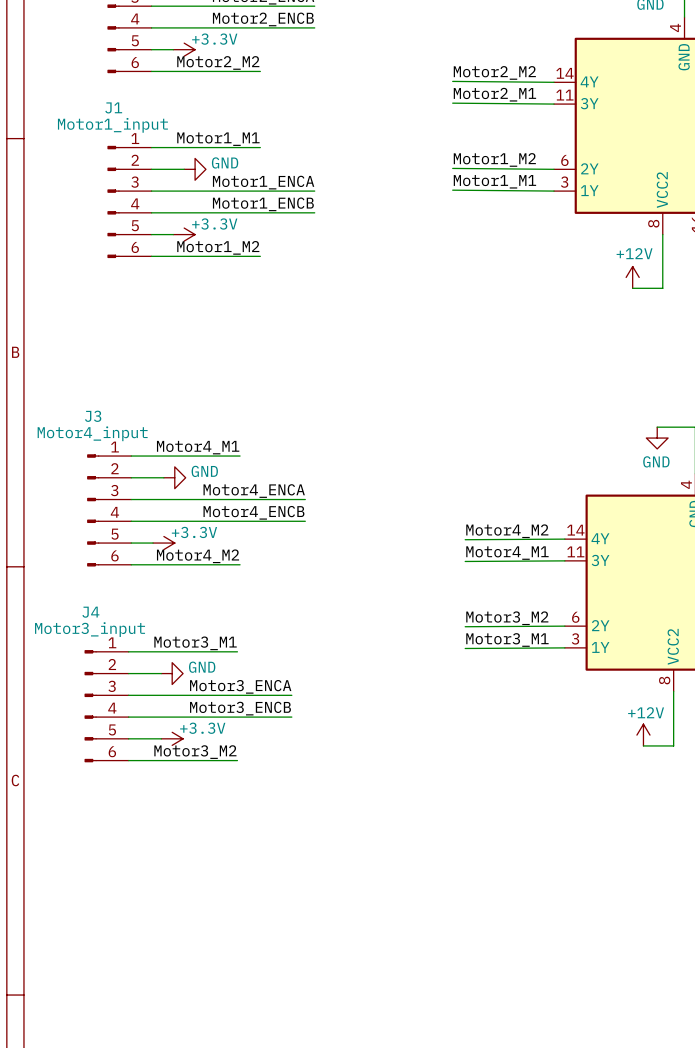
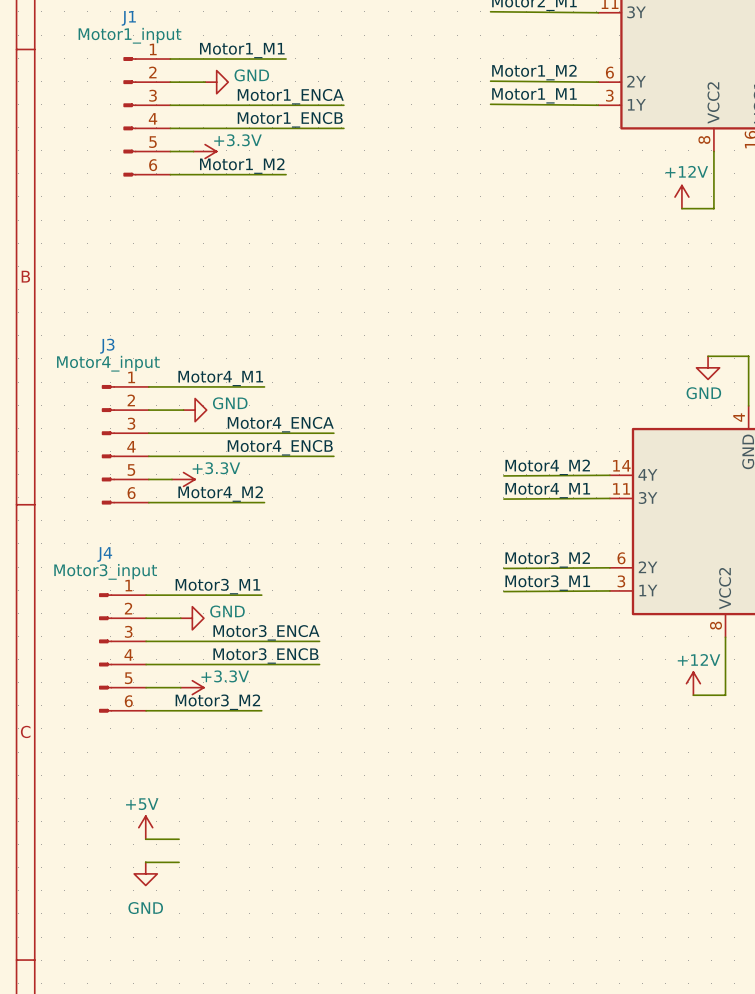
power symbol: none -> +5V (145, 827)
wire: none -> (145, 839) (179, 839)
wire: none -> (145, 862) (179, 862)
power symbol: none -> GND (145, 873)

